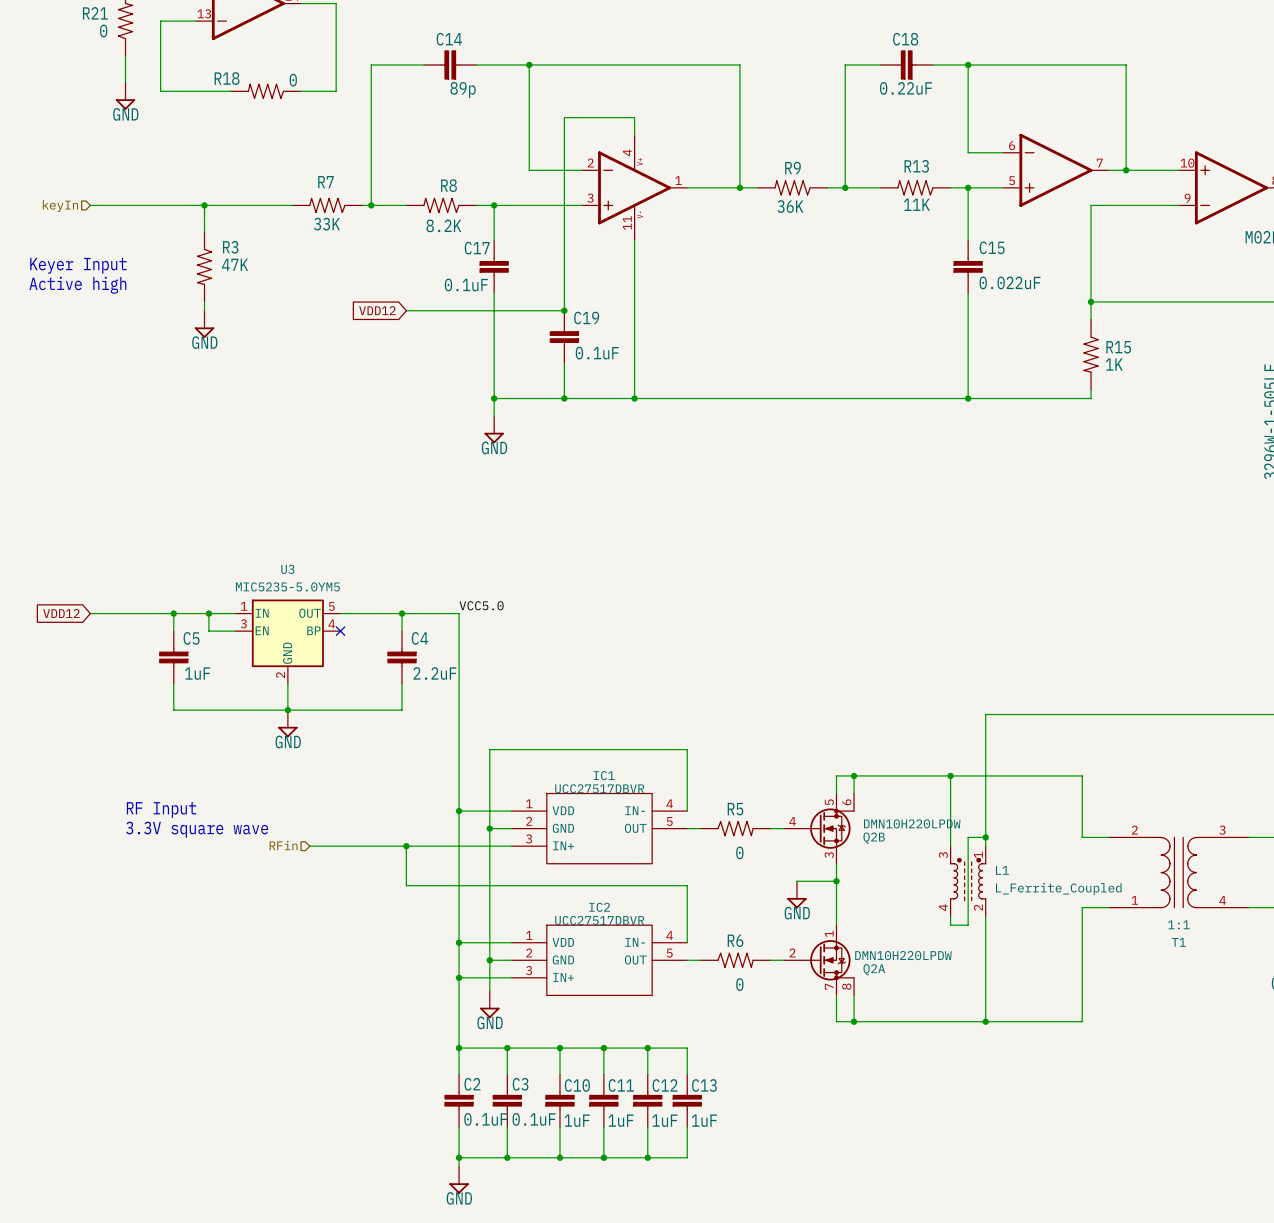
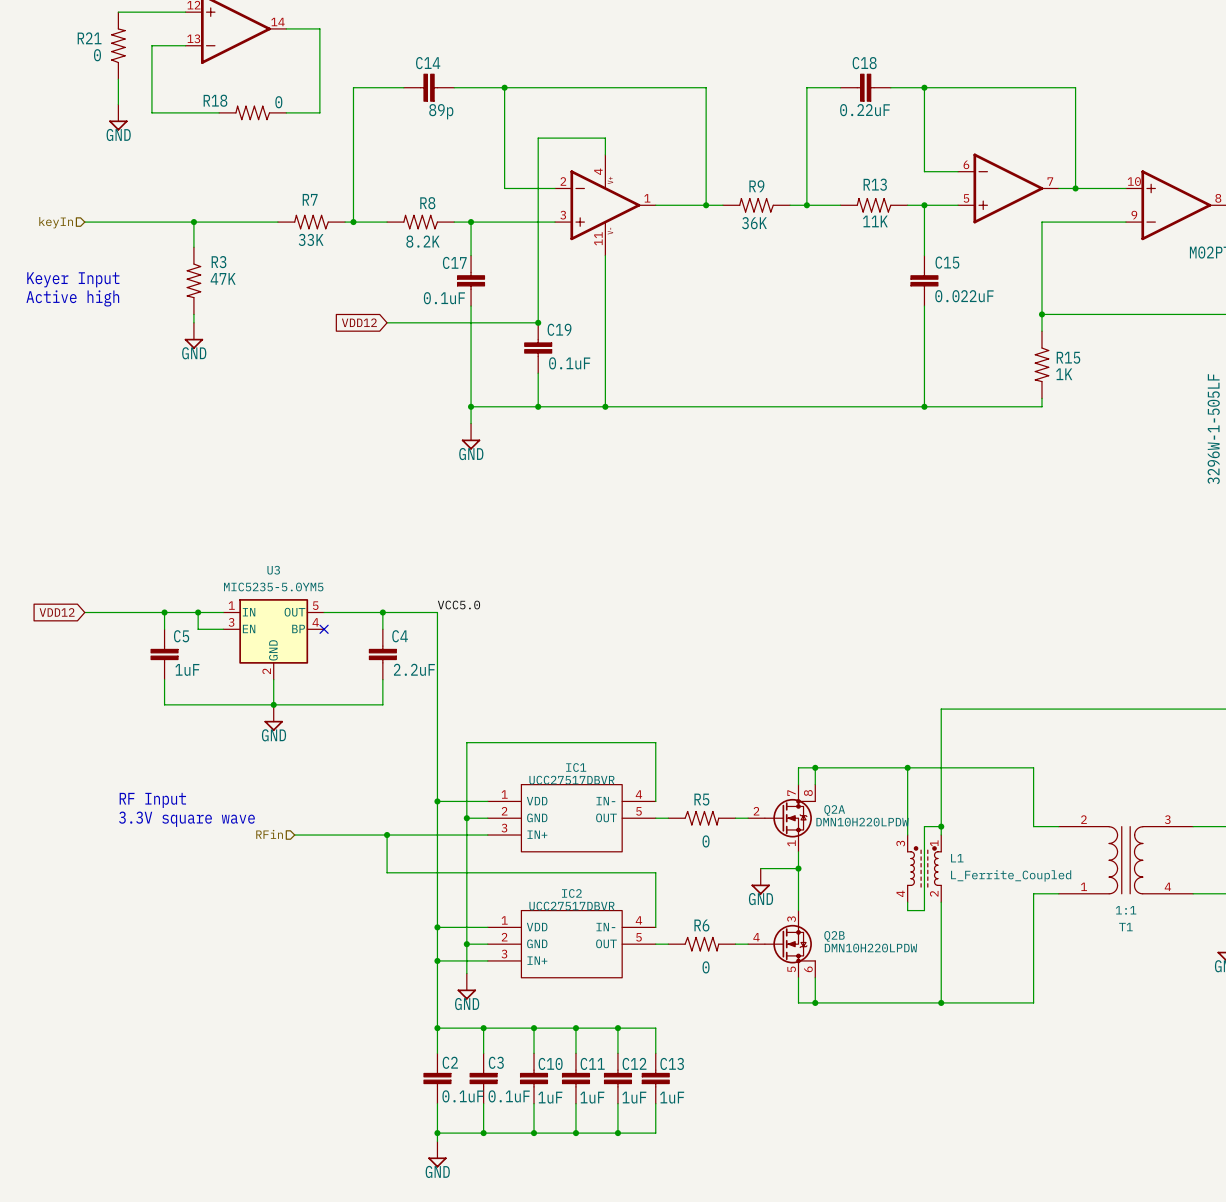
Q2B position: (818, 828) -> (781, 944)
Q2B flip: as is (827, 828) -> up-down (790, 944)
Q2A position: (818, 960) -> (781, 818)
Q2A flip: as is (827, 960) -> up-down (790, 818)

